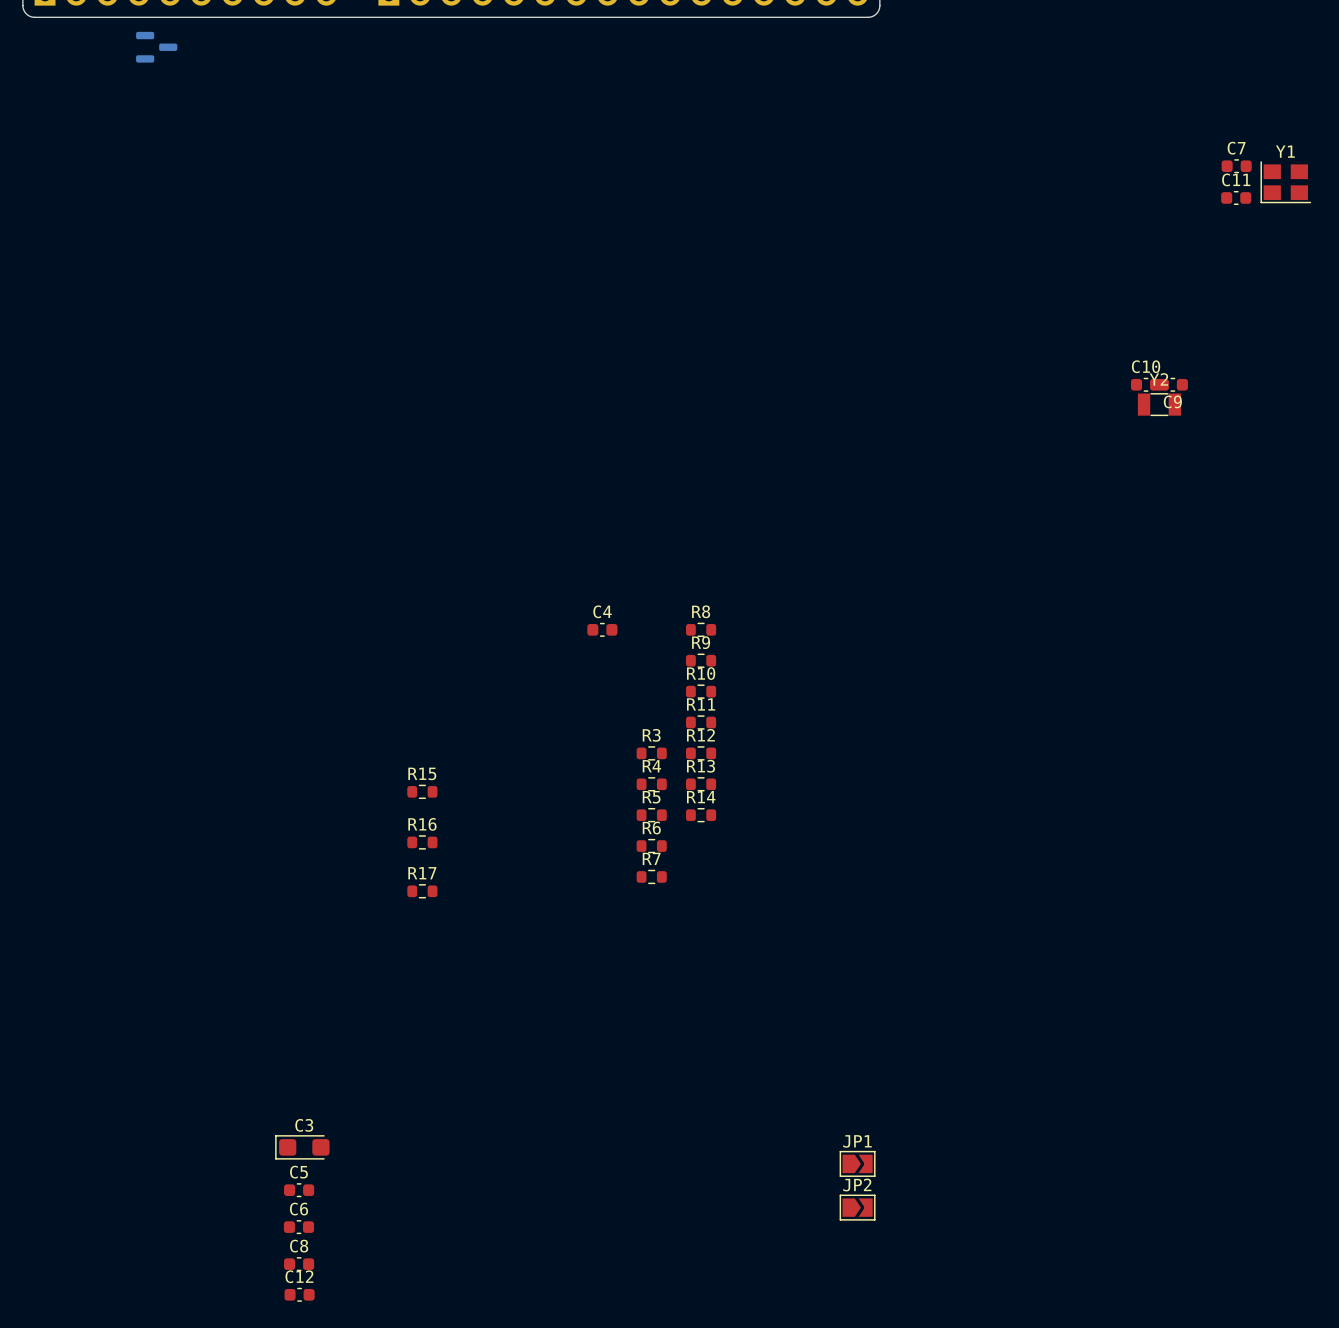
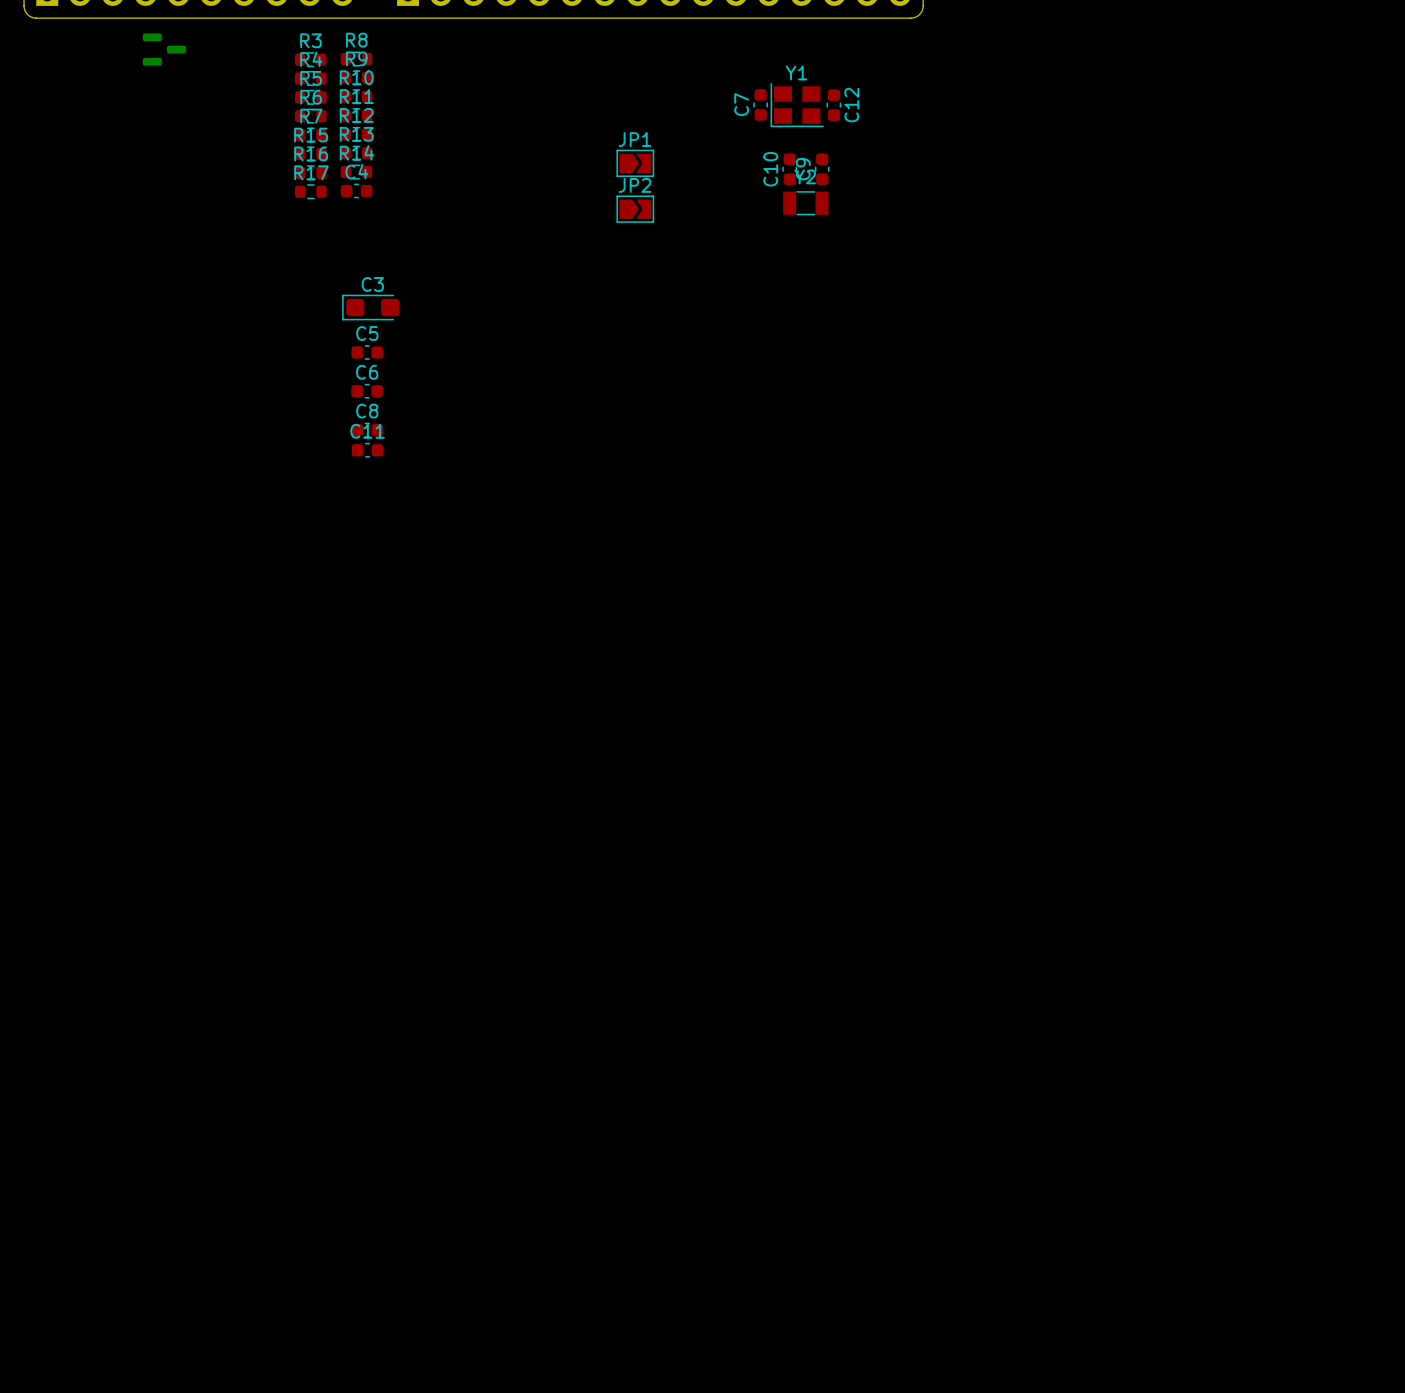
C7 name position: C7 (1236, 148) -> C7 (741, 104)
C7 rotation: 0° (1236, 166) -> 90° clockwise (760, 104)
C7 position: (1236, 166) -> (760, 104)
Y1 position: (1285, 182) -> (797, 105)
C11 position: (1236, 197) -> (367, 450)
C10 name position: C10 (1146, 366) -> C10 (770, 169)
C10 rotation: 0° (1146, 384) -> 90° clockwise (789, 169)
C10 position: (1146, 384) -> (789, 169)
C9 rotation: 0° (1172, 384) -> 90° clockwise (822, 169)
C9 position: (1172, 384) -> (822, 169)
Y2 position: (1159, 404) -> (805, 203)
C4 position: (602, 629) -> (356, 190)
R8 position: (701, 629) -> (356, 59)
R9 position: (701, 660) -> (356, 77)
R10 position: (701, 691) -> (356, 96)
R11 position: (701, 722) -> (356, 115)
R3 position: (651, 753) -> (310, 59)
R12 position: (701, 753) -> (356, 134)
R4 position: (651, 784) -> (310, 78)
R13 position: (701, 784) -> (356, 153)
R15 position: (422, 791) -> (310, 154)
R5 position: (651, 815) -> (310, 97)
R14 position: (701, 815) -> (356, 172)
R16 position: (422, 842) -> (310, 172)
R6 position: (651, 846) -> (310, 116)
R7 position: (651, 876) -> (310, 135)
R17 position: (422, 891) -> (310, 191)
C3 position: (302, 1147) -> (370, 307)
JP1 position: (857, 1163) -> (635, 163)
C5 position: (299, 1190) -> (367, 352)
JP2 position: (857, 1207) -> (635, 209)
C6 position: (298, 1227) -> (367, 391)
C8 position: (299, 1264) -> (367, 430)
C12 rotation: 0° (299, 1294) -> 90° clockwise (833, 105)
C12 position: (299, 1294) -> (833, 105)

